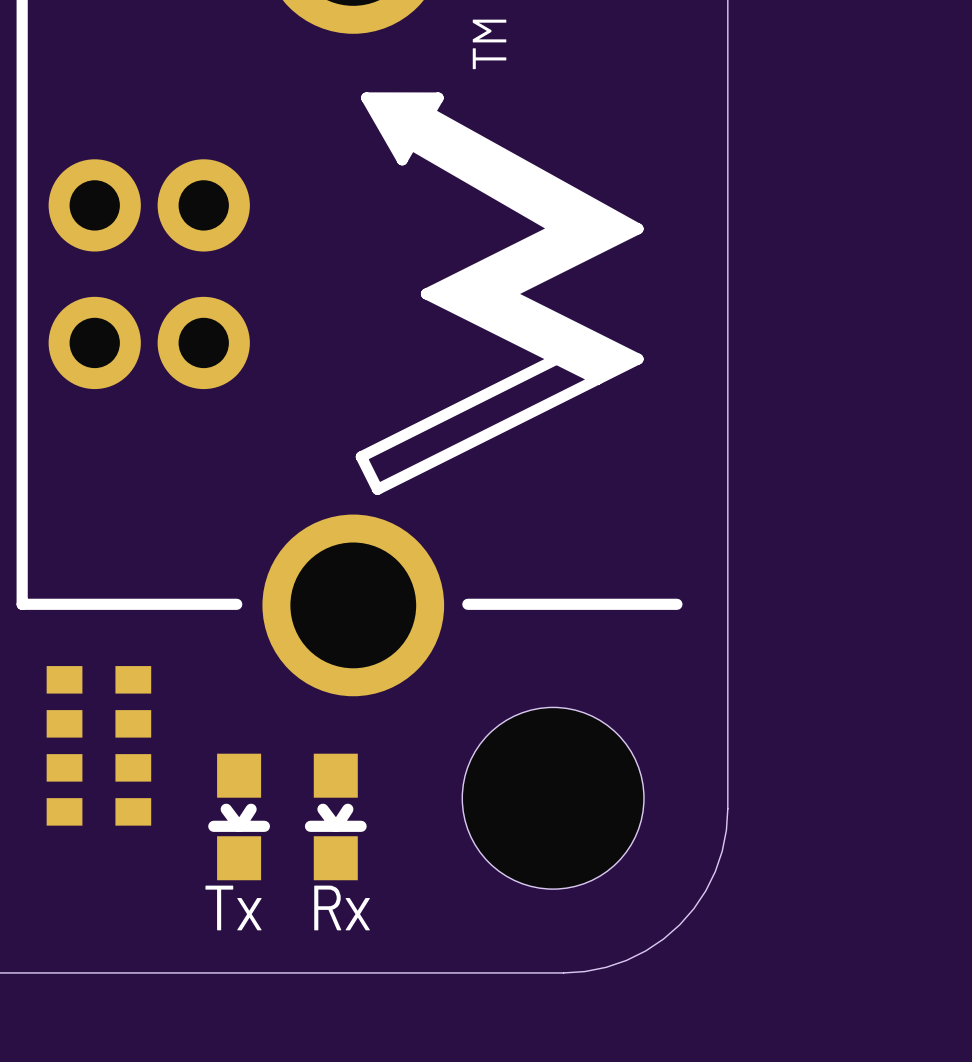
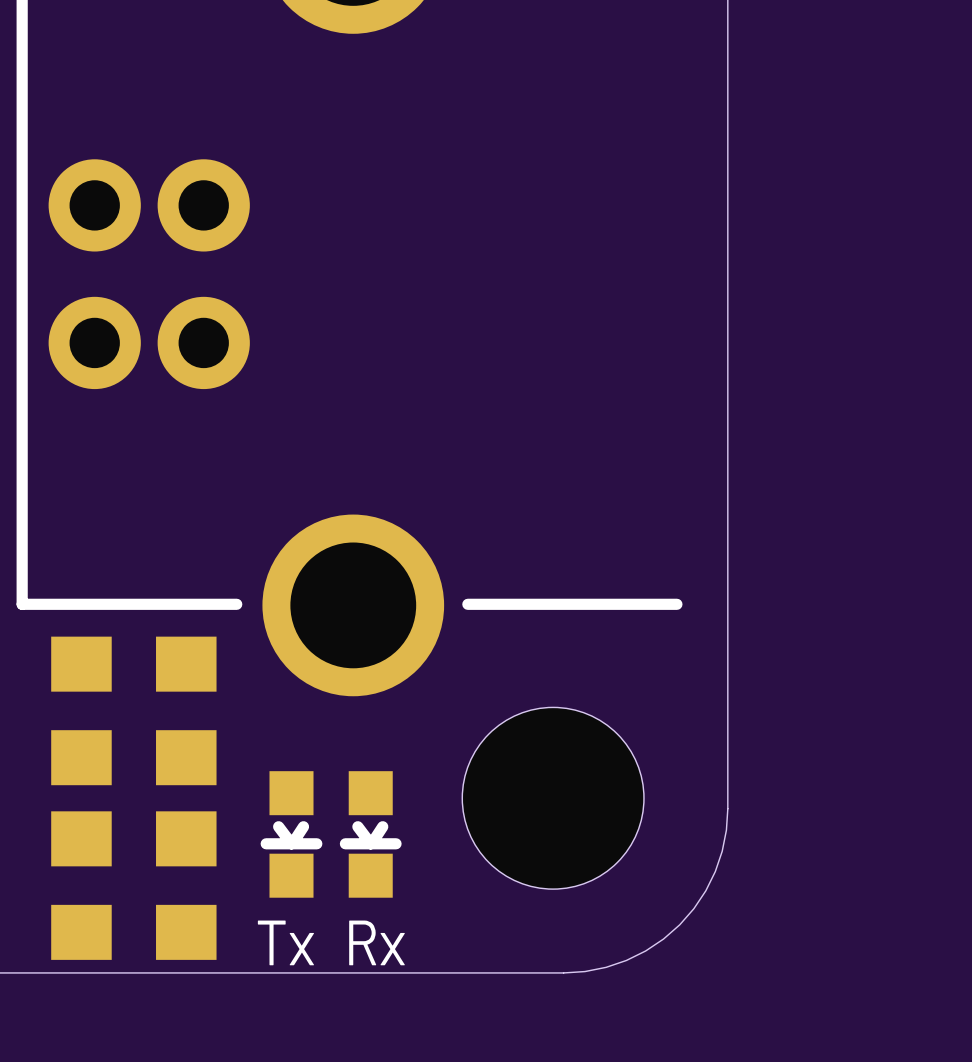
text: TM (489, 44) -> none
drawing: [355, 92, 644, 495] -> none
part footprint: [46, 666, 152, 826] -> [51, 636, 112, 786]
part: none -> (186, 710)
part: (239, 816) -> none
part: (335, 816) -> none
part: none -> (291, 834)
part: none -> (370, 834)
part: none -> (81, 885)
part: none -> (186, 885)
text position: Tx (233, 907) -> Tx (285, 942)
text position: Rx (342, 907) -> Rx (377, 942)

